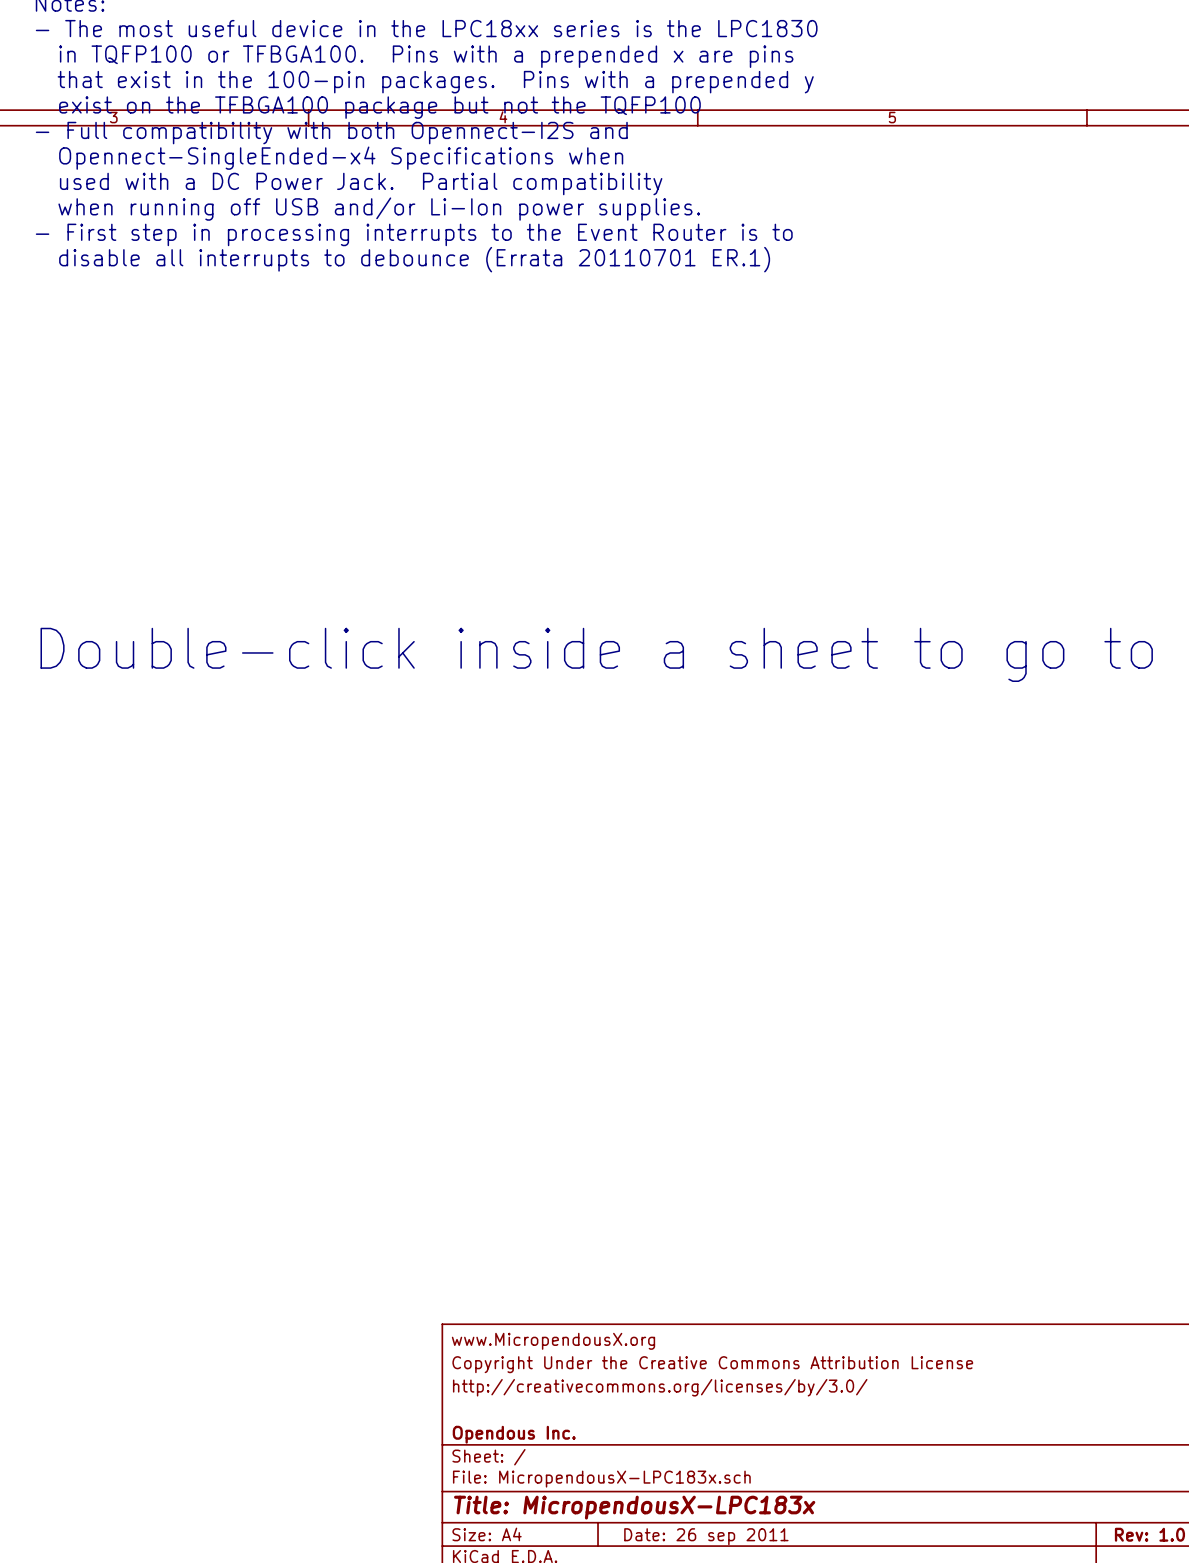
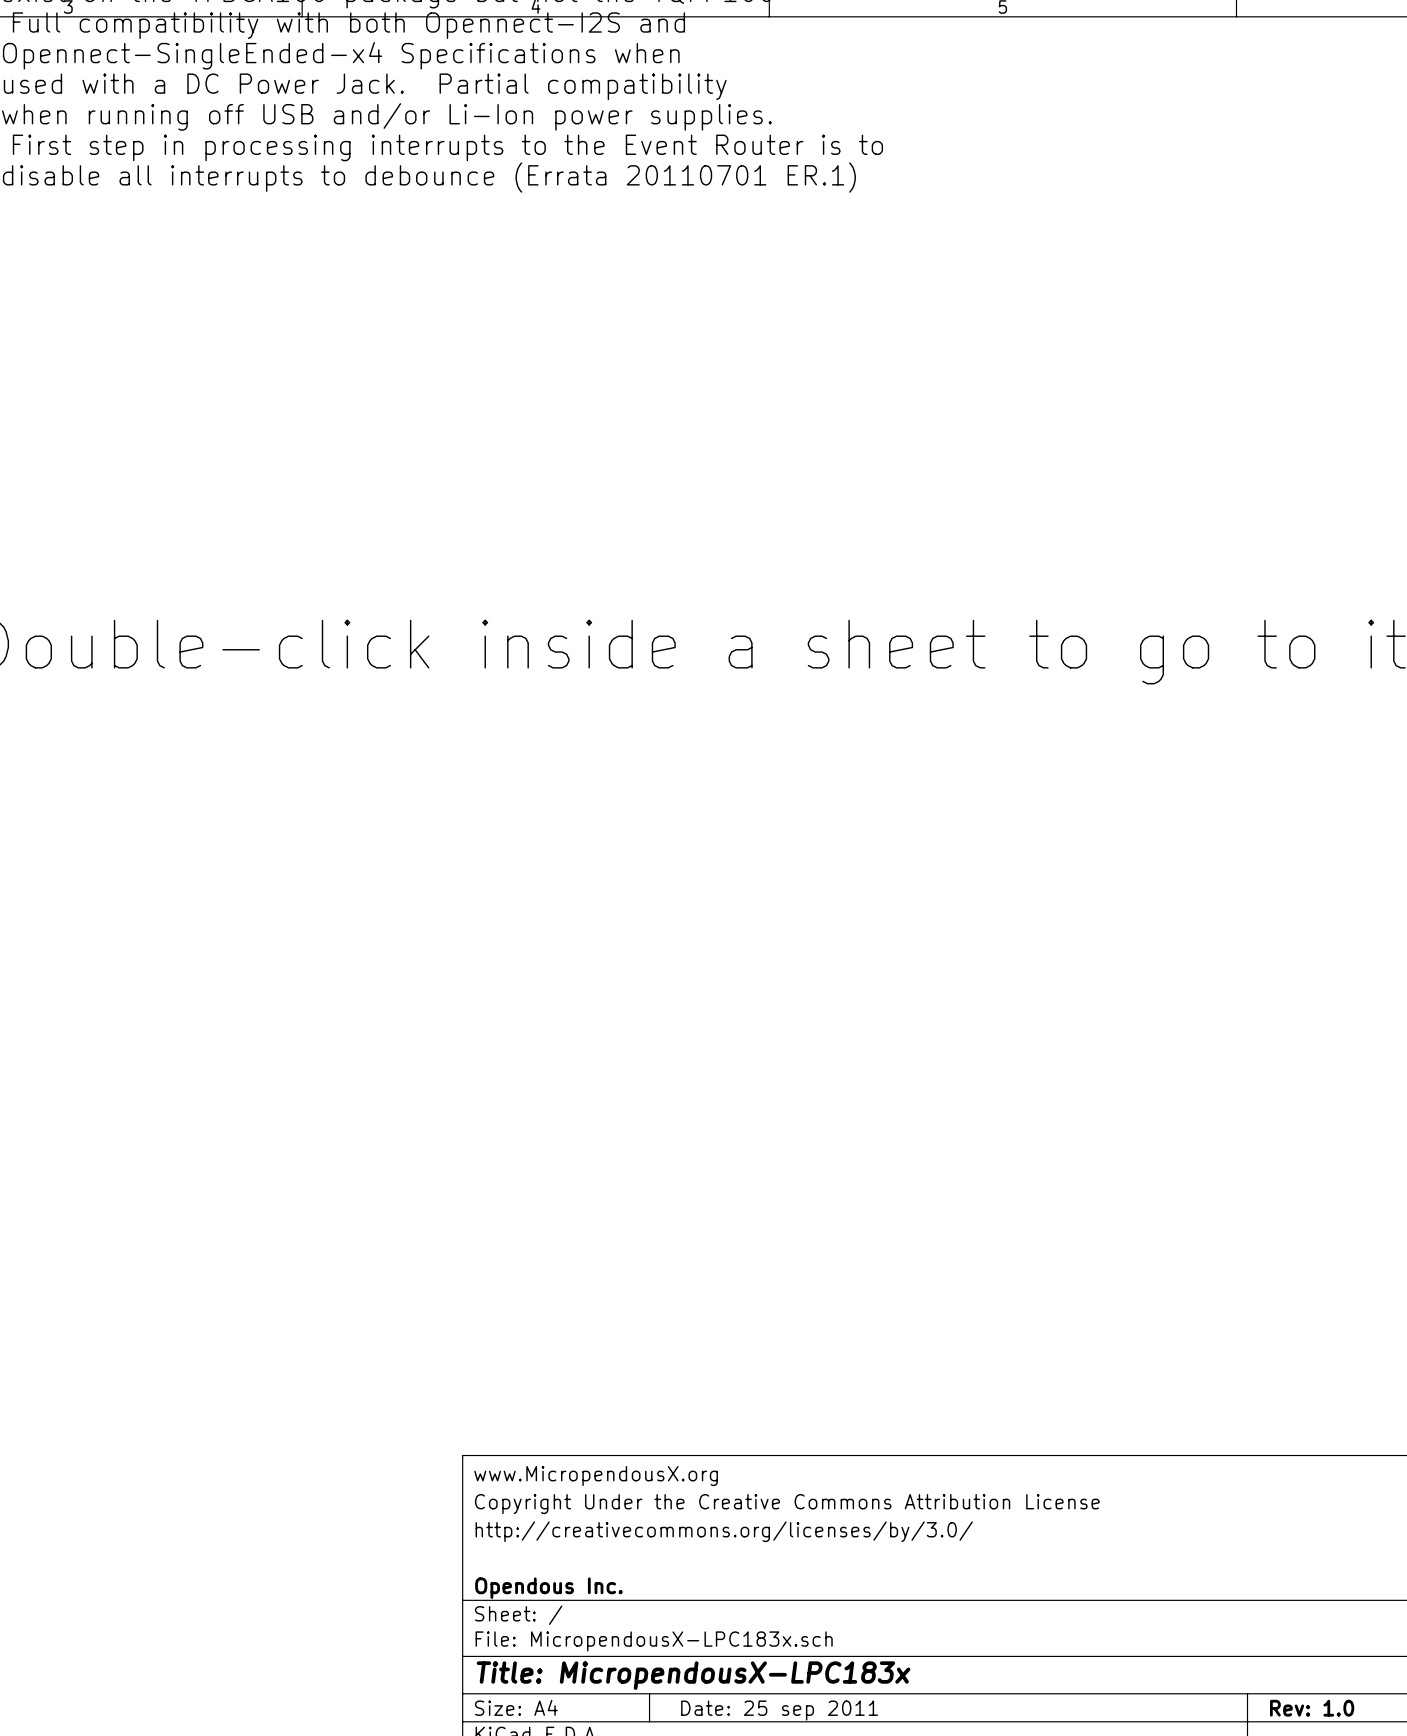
title block: Date: 26 sep 2011 (706, 1536) -> Date: 25 sep 2011 (779, 1710)

